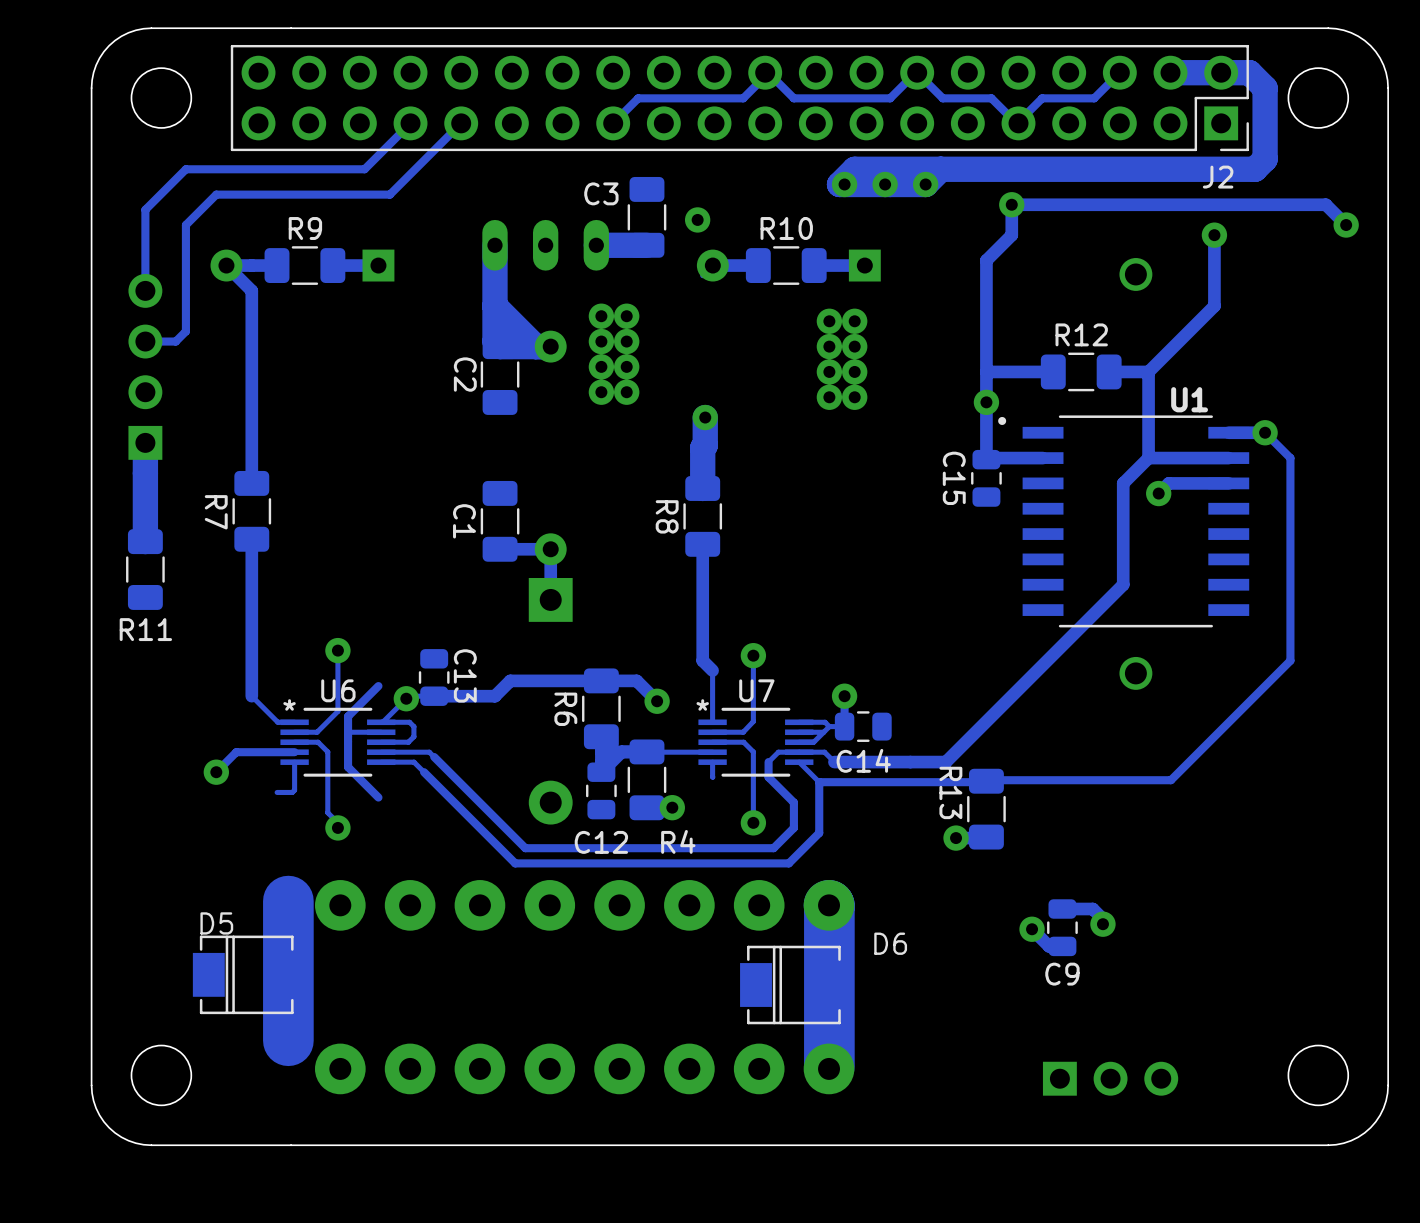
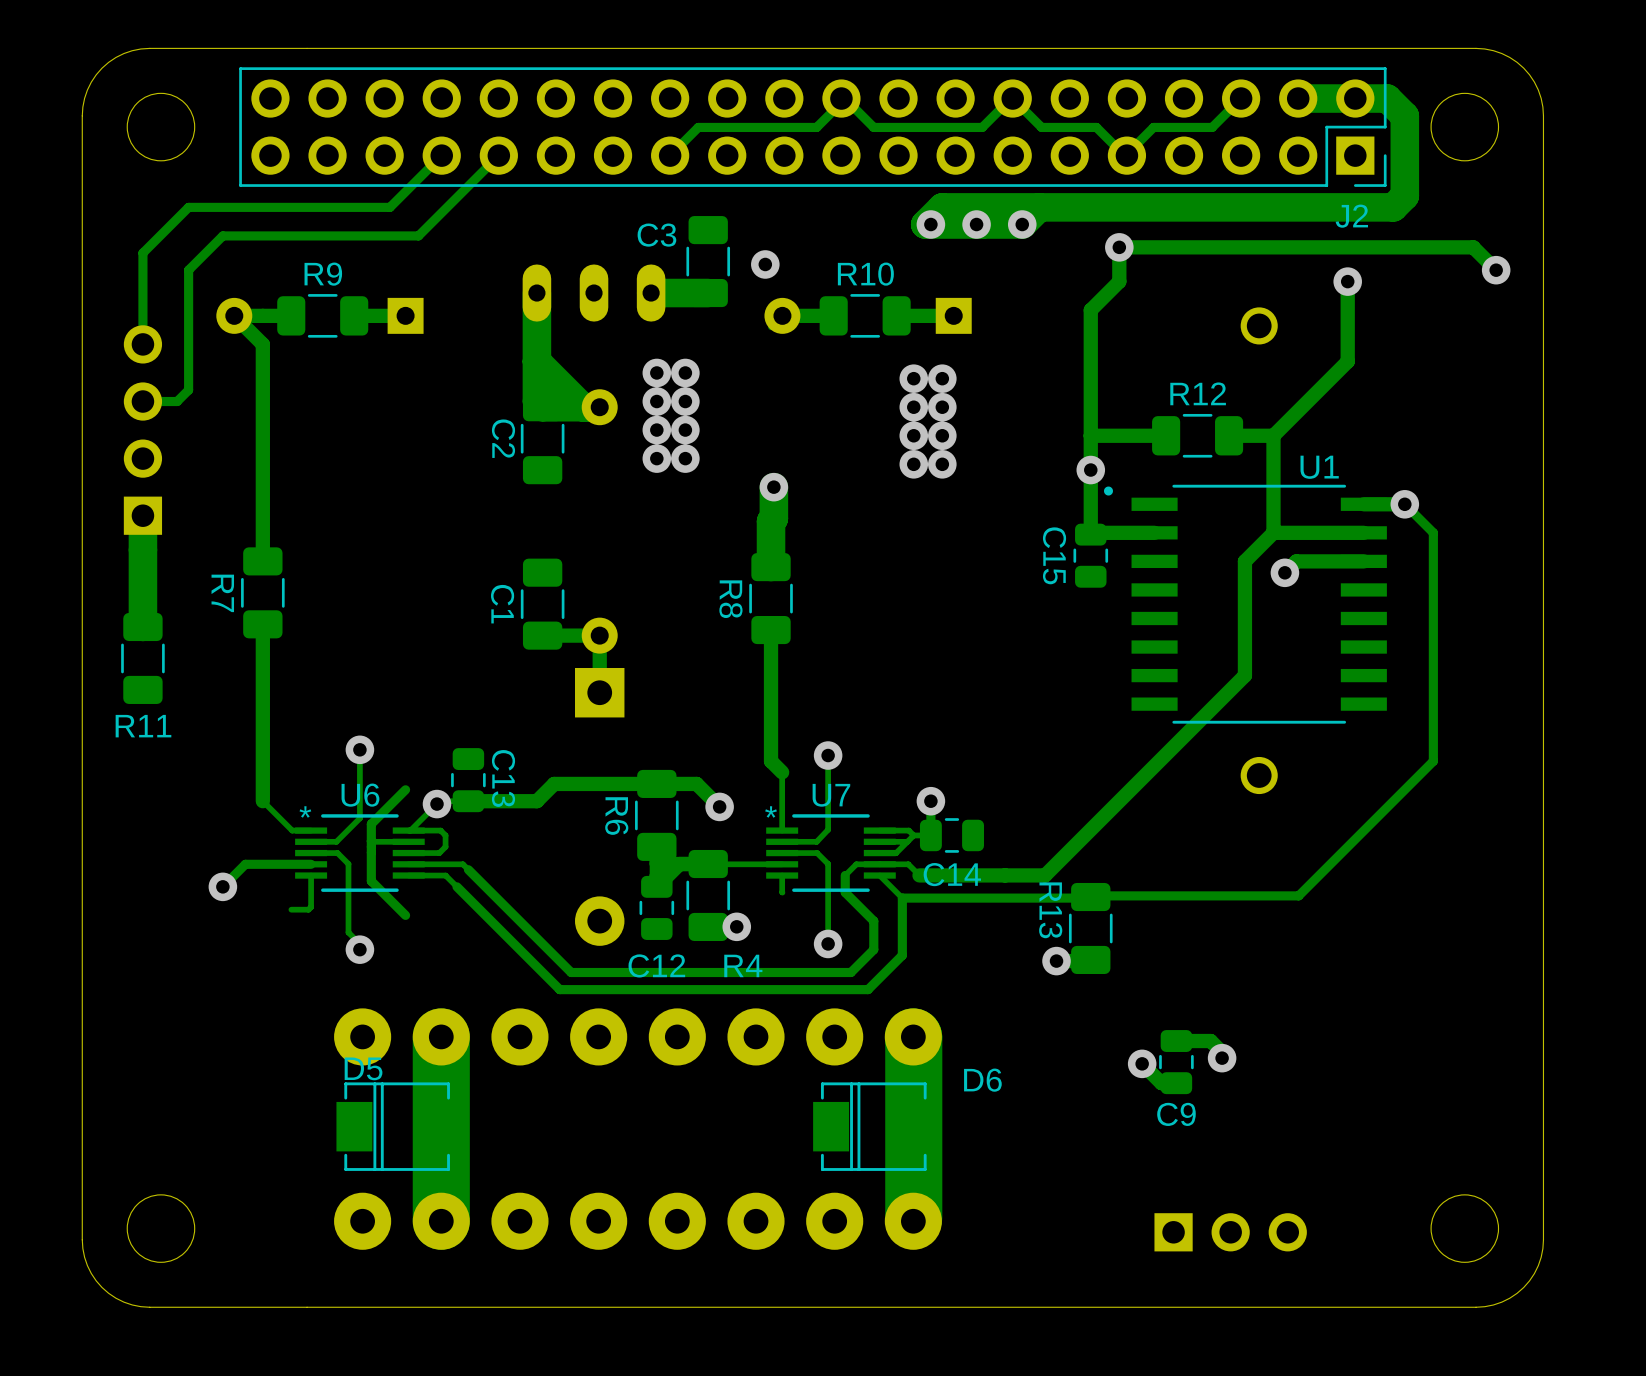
track: (288, 901) (288, 1040) -> none
track: none -> (441, 1036) (441, 1221)
D5 position: (246, 974) -> (397, 1126)

